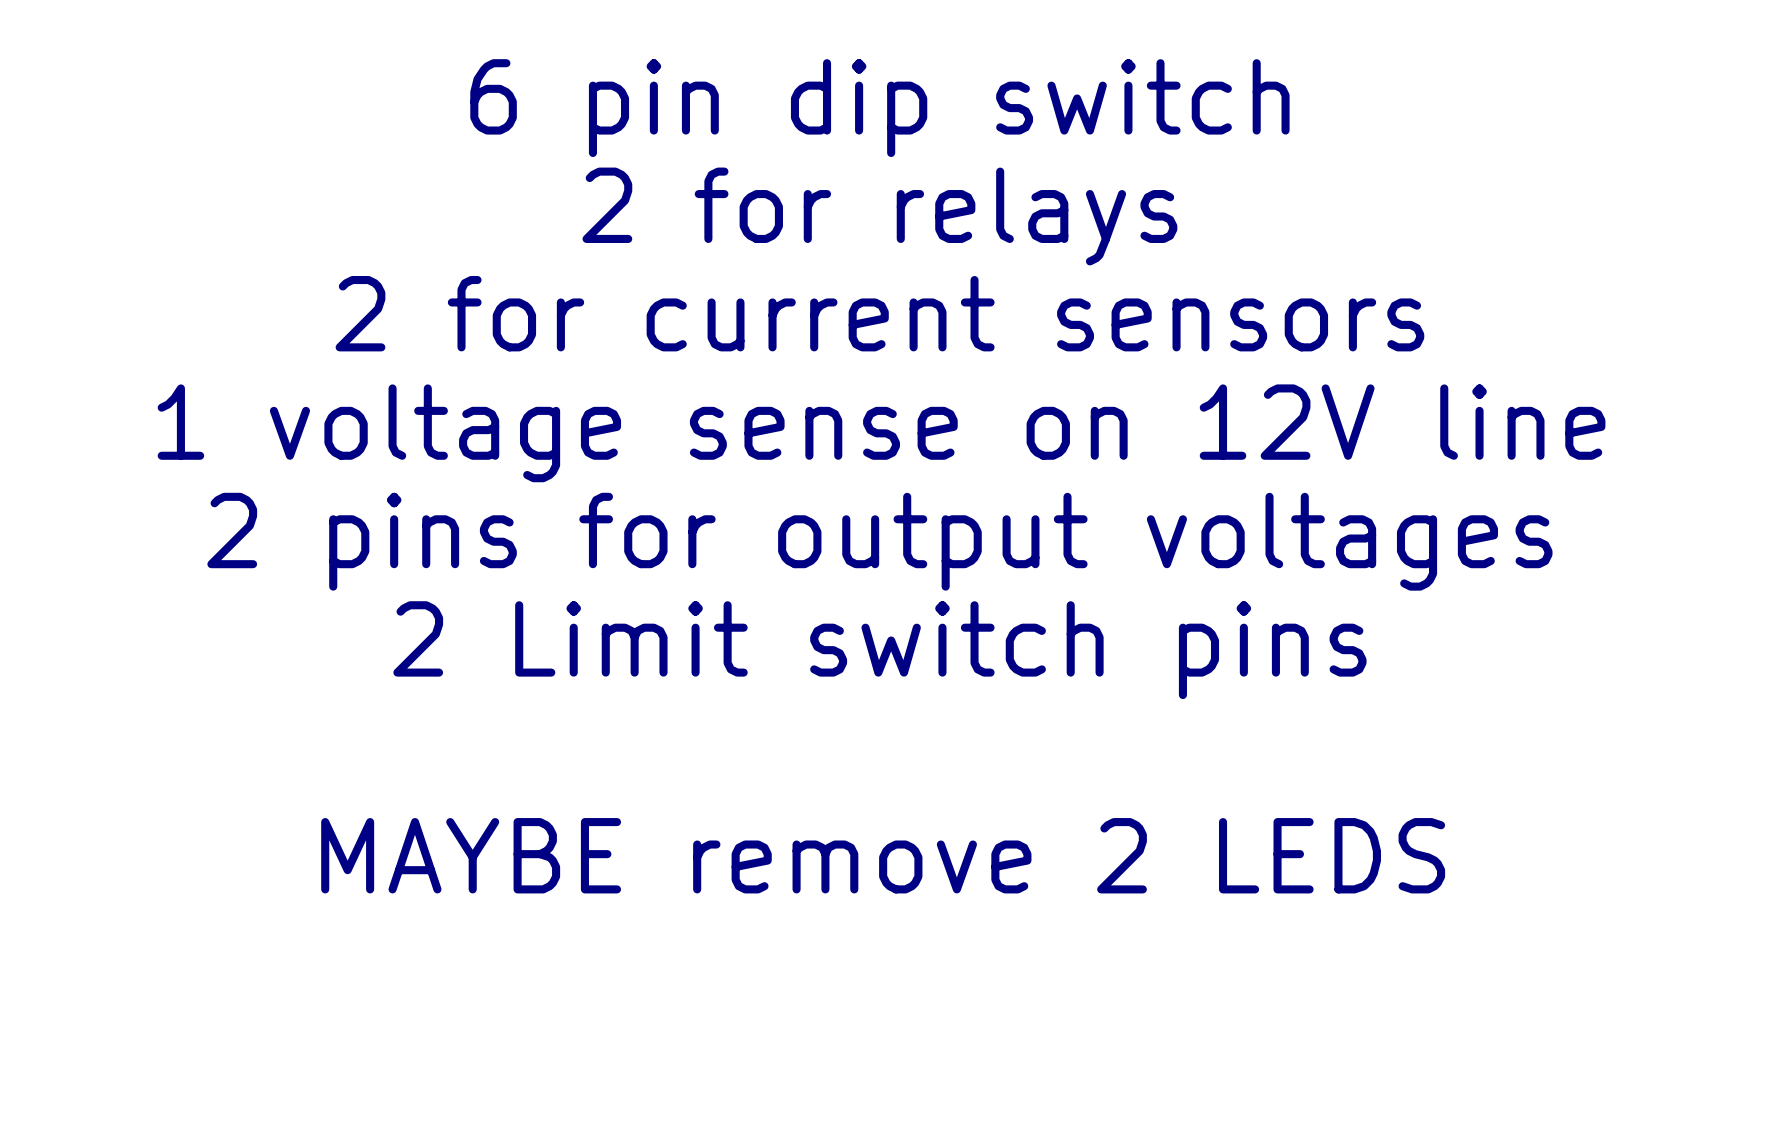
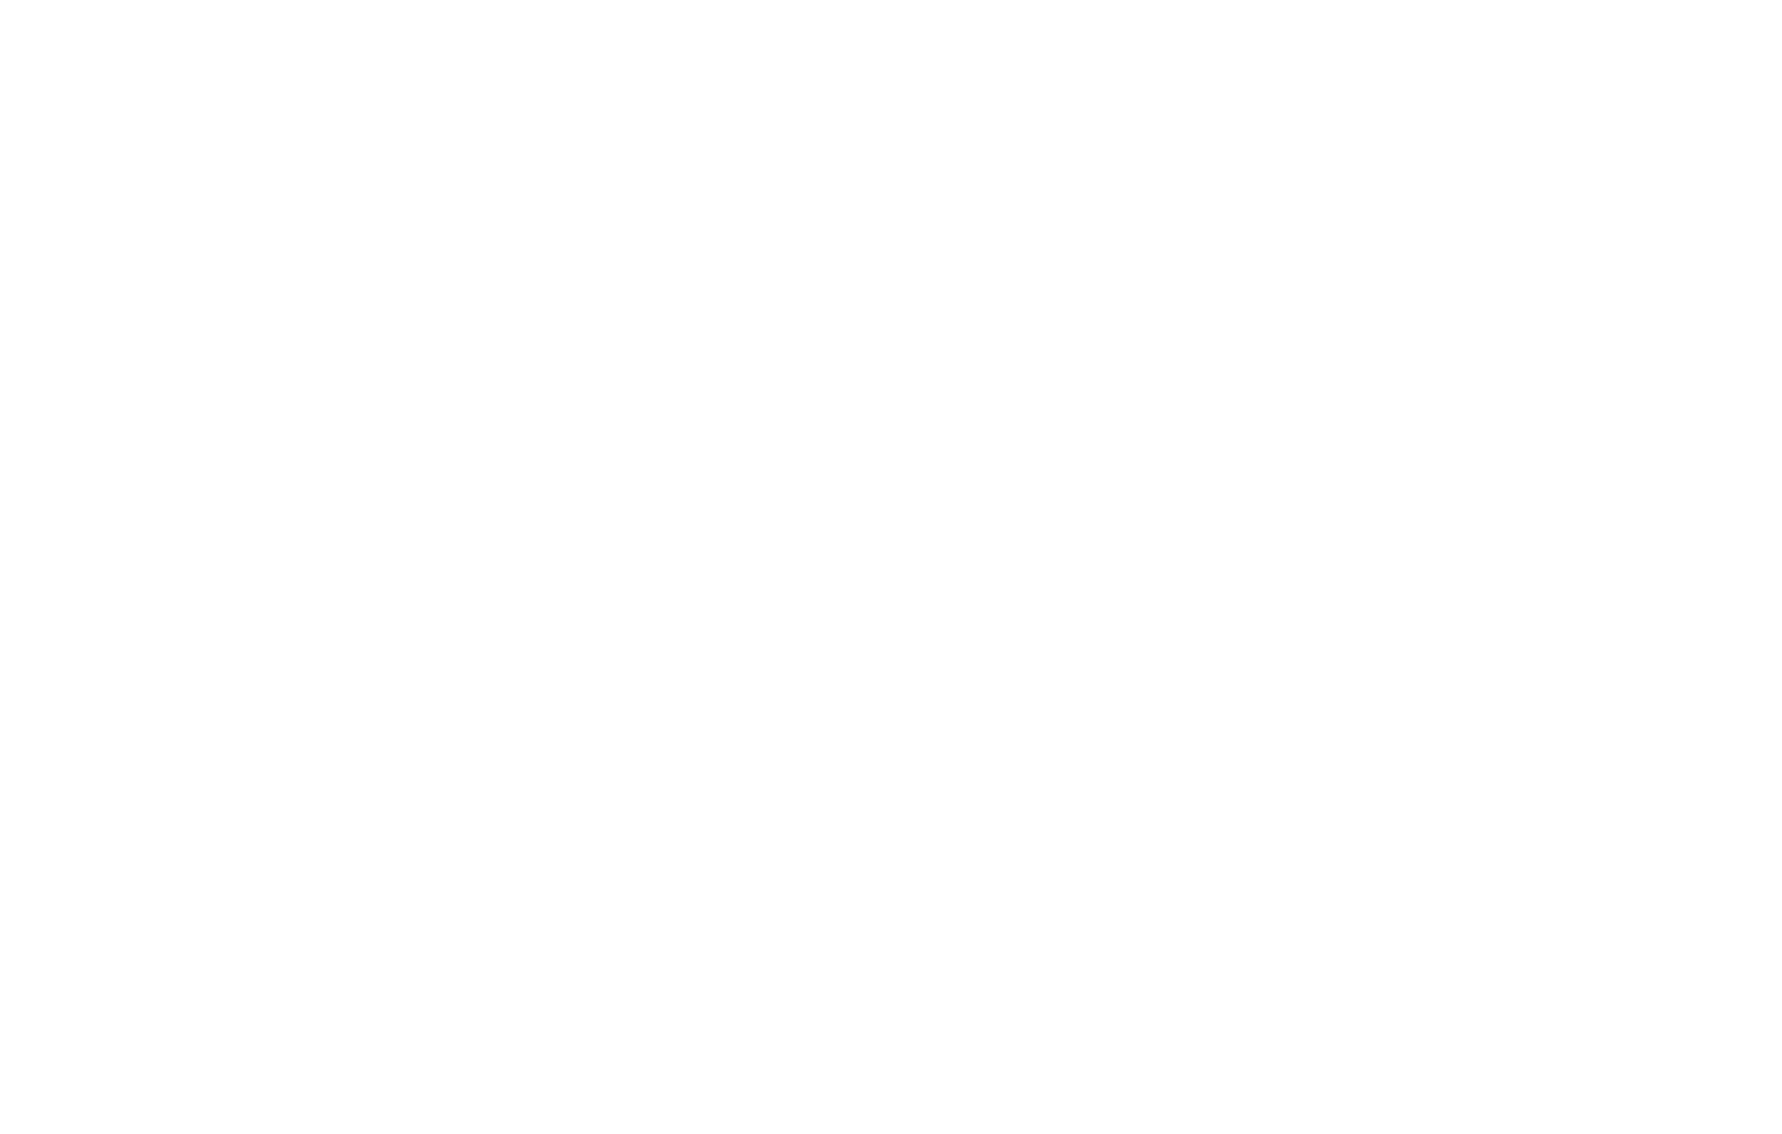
text: 6 pin dip switch (879, 108) -> none
text: 2 for relays (879, 216) -> none
text: 2 for current sensors (879, 313) -> none
text: 1 voltage sense on 12V line (881, 433) -> none
text: 2 pins for output voltages (879, 541) -> none
text: 2 Limit switch pins (879, 650) -> none
text: MAYBE remove 2 LEDS (883, 855) -> none

